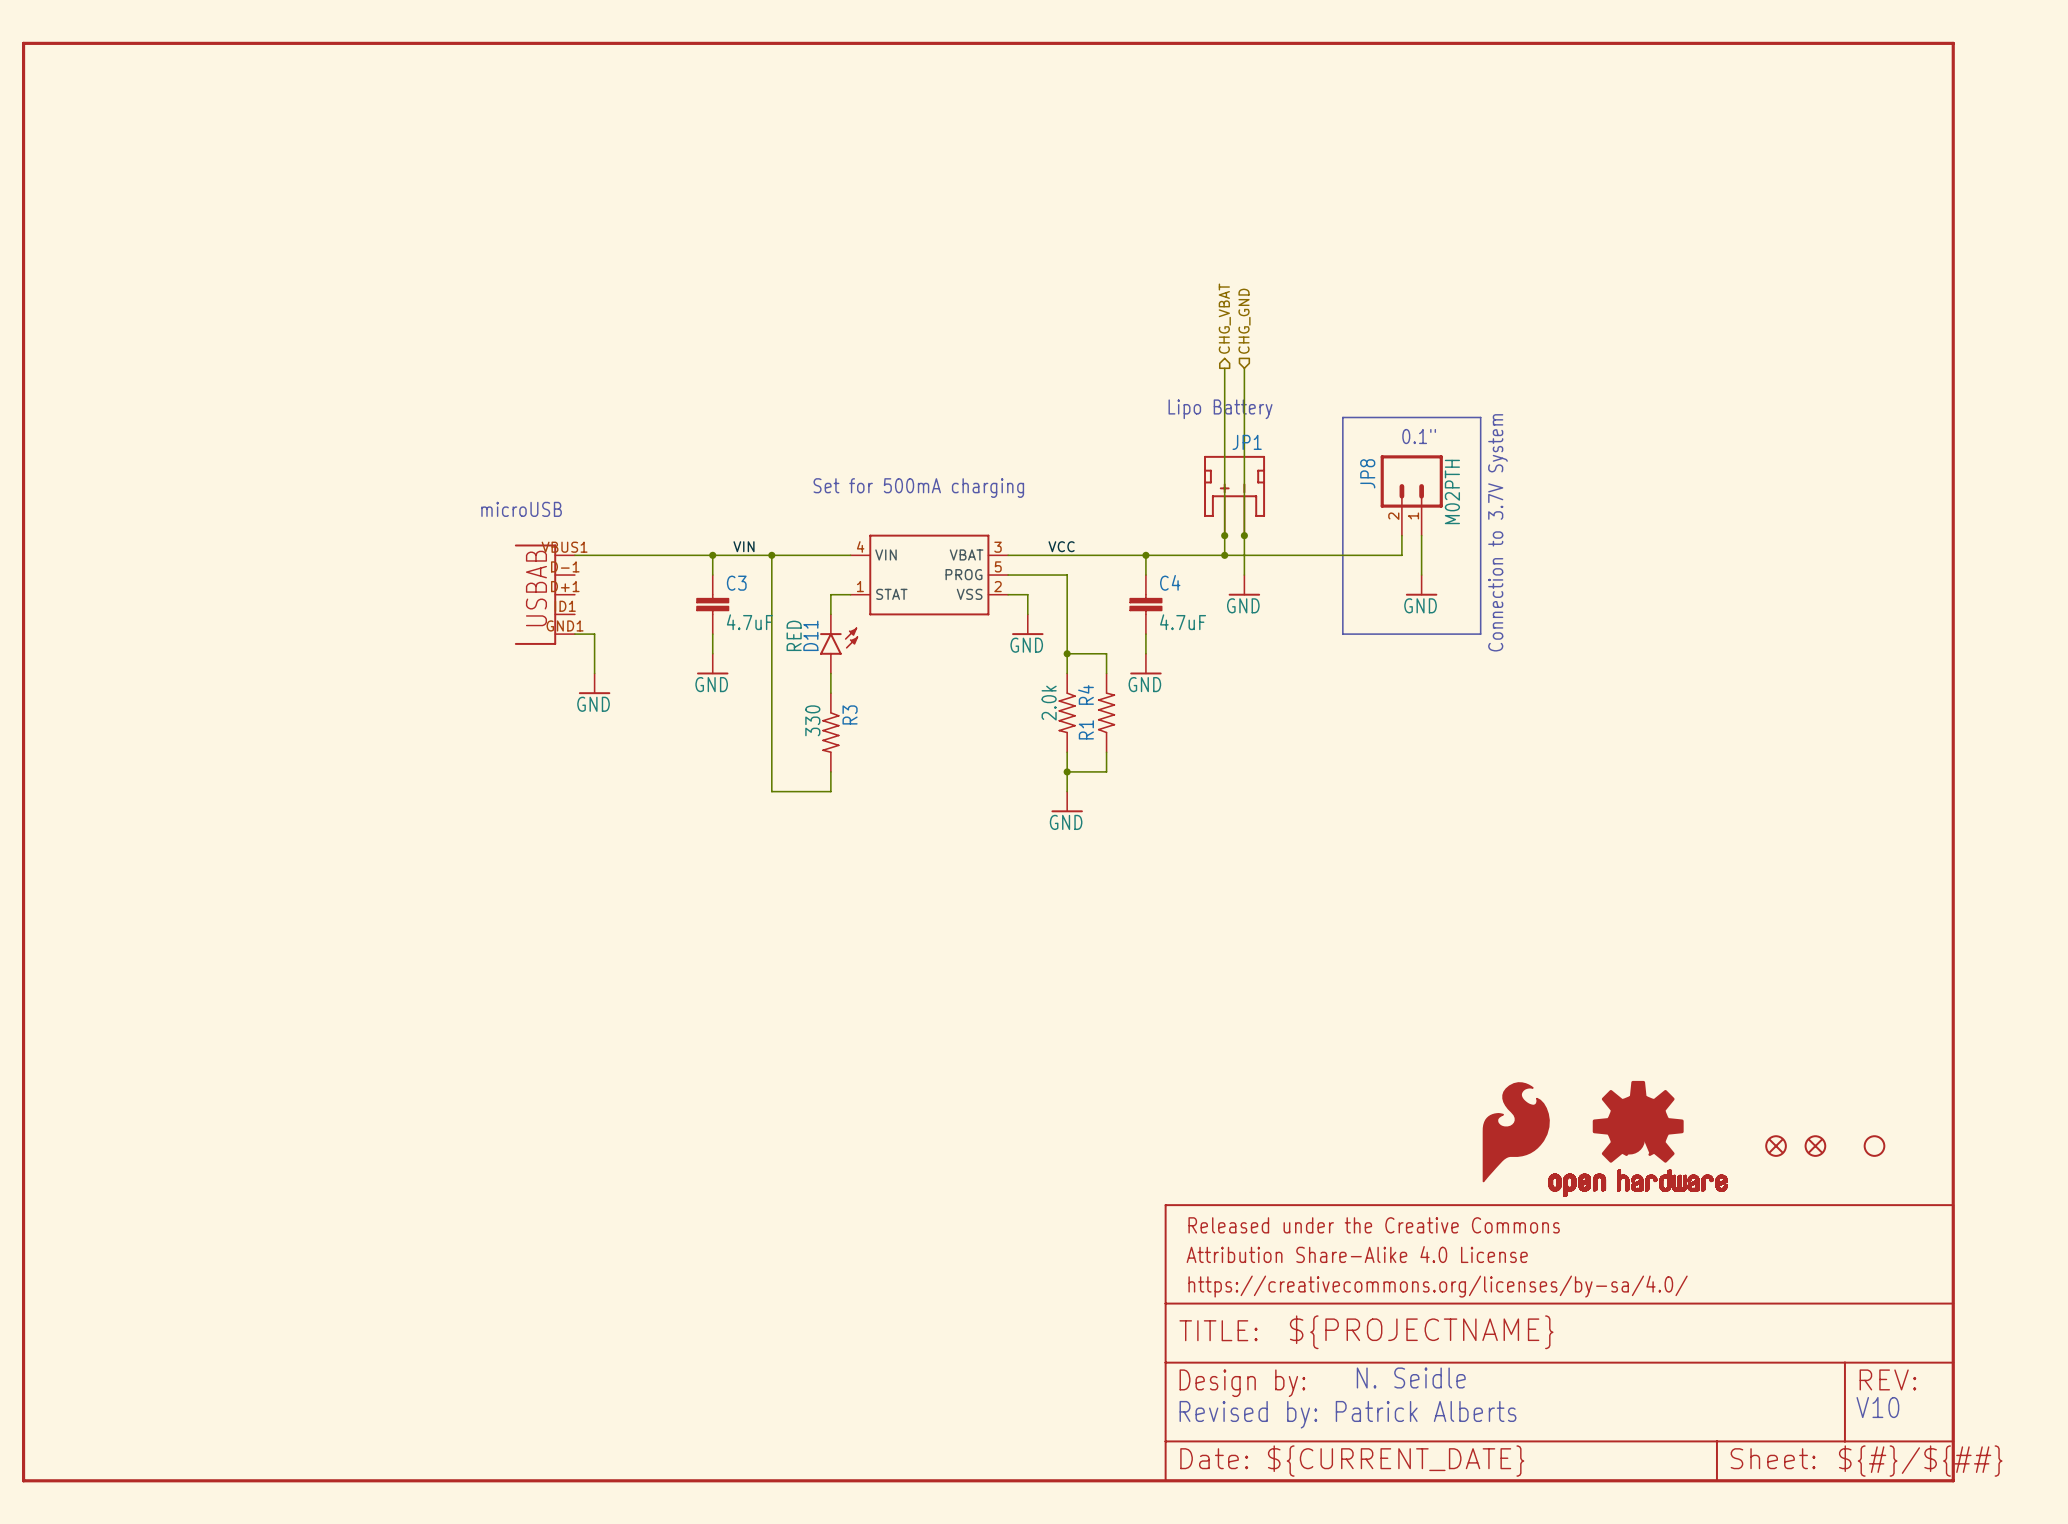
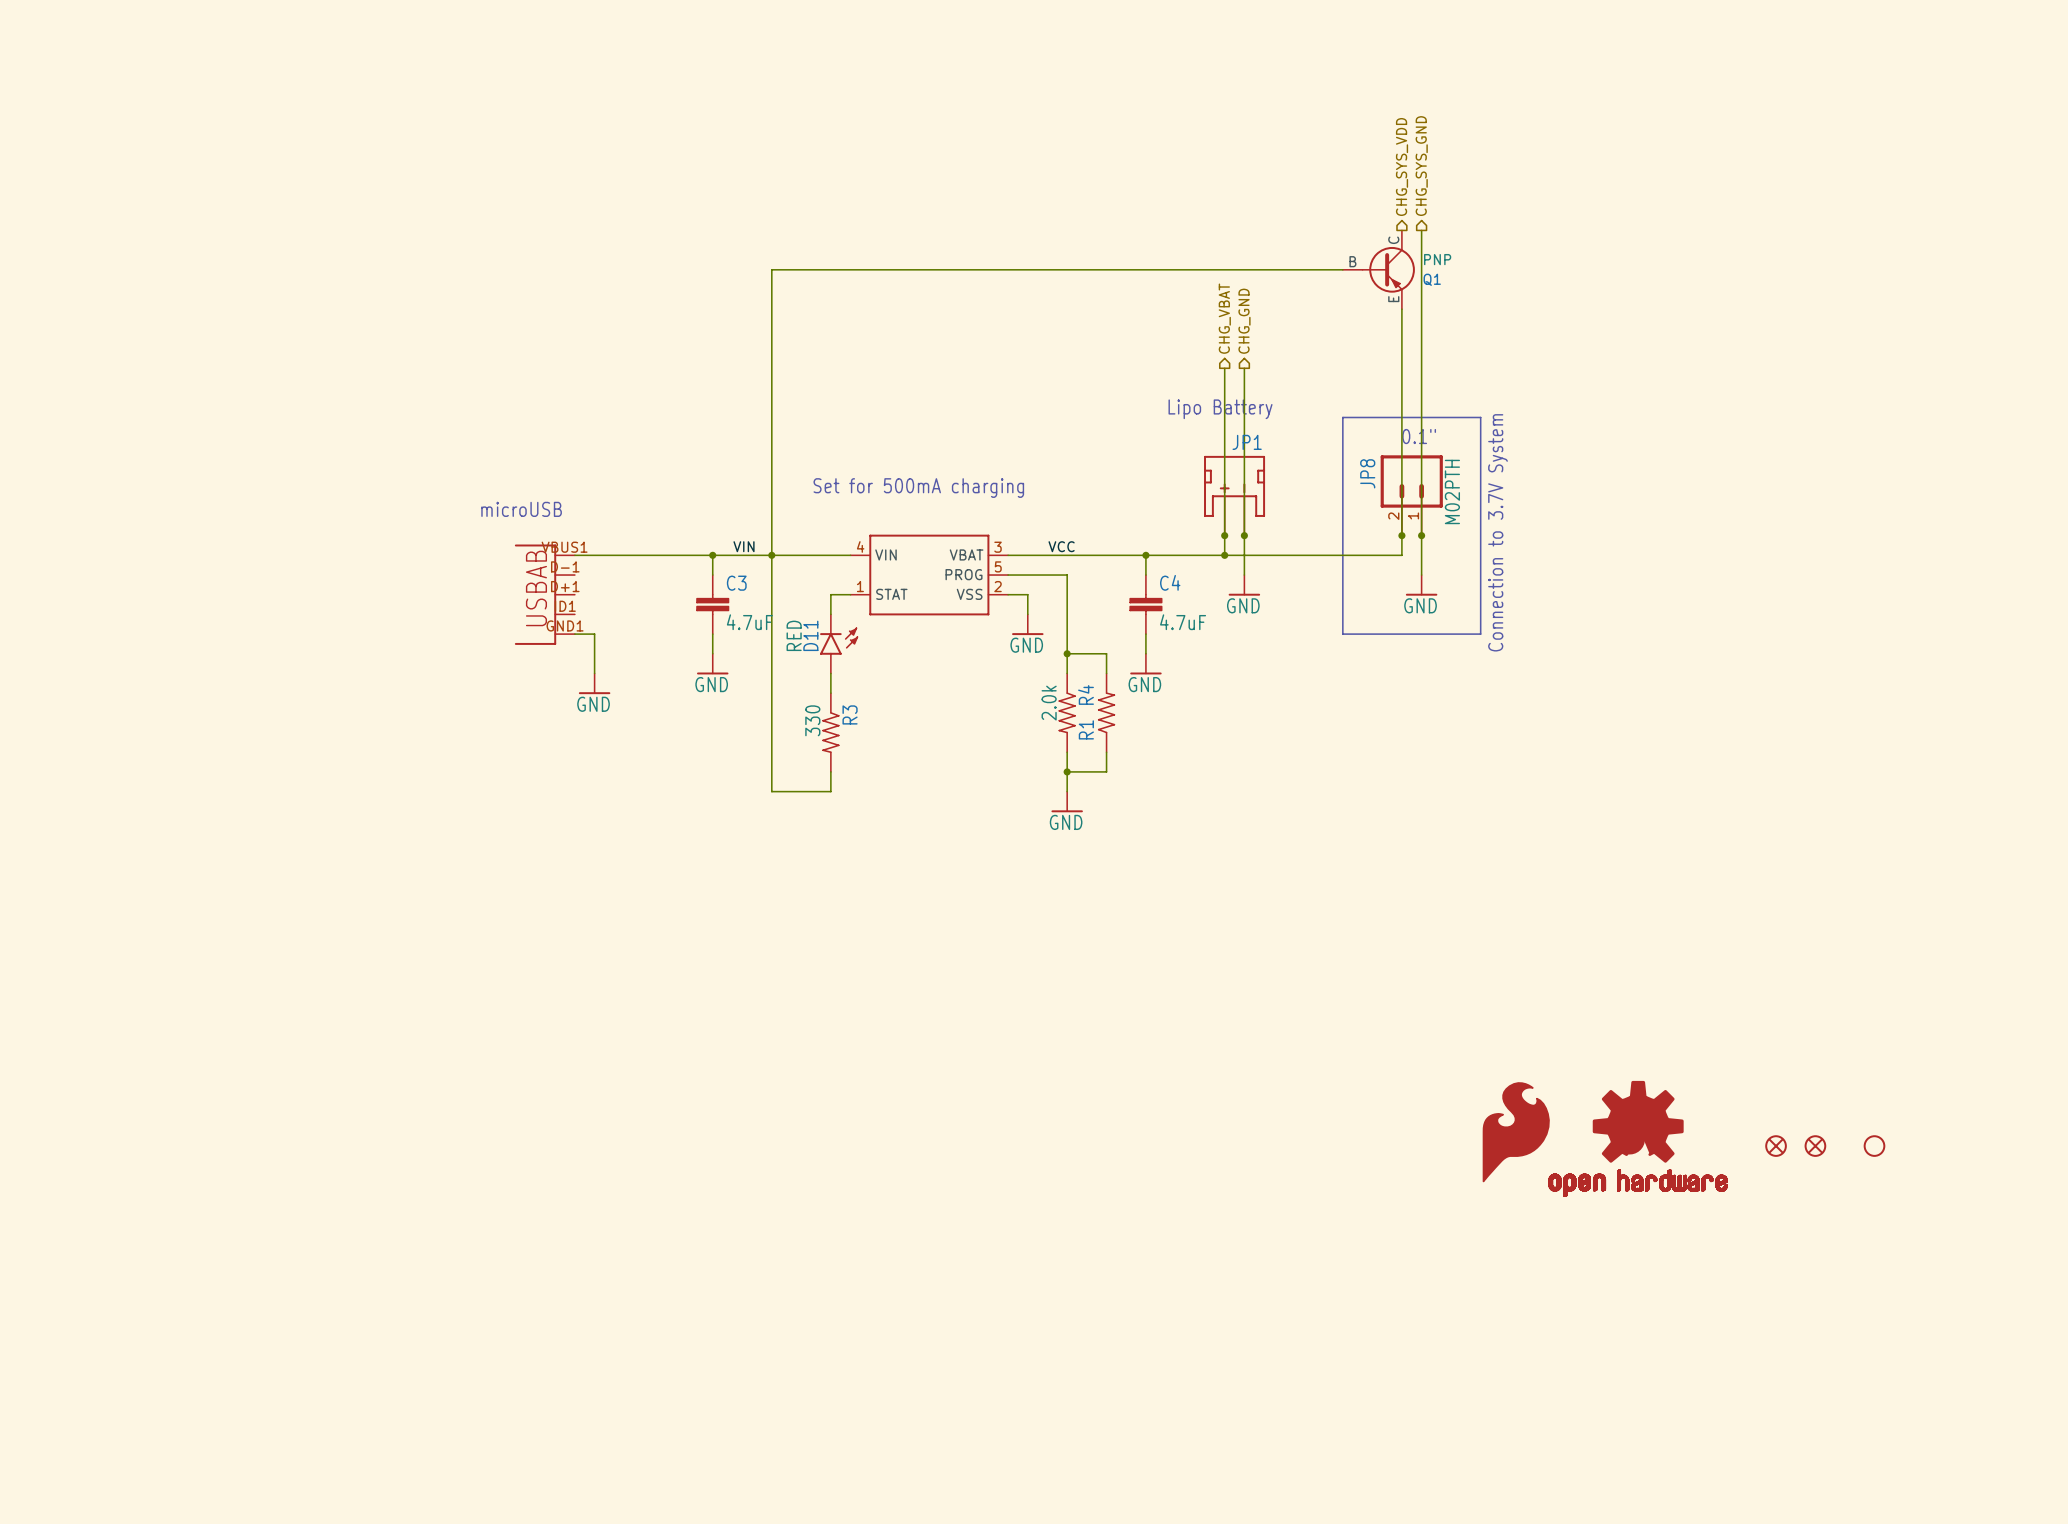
hierarchical label: none -> CHG_SYS_VDD (1402, 166)
hierarchical label: none -> CHG_SYS_GND (1421, 166)
wire: none -> (1421, 230) (1421, 535)
wire: none -> (1342, 269) (771, 269) (771, 555)
Q1: none -> PNP (1378, 269)
wire: none -> (1401, 309) (1401, 535)
hierarchical label shape: input (1244, 321) -> output (1244, 321)
junction: none -> (1401, 535)
junction: none -> (1421, 535)
part: (988, 762) -> none
part: (1559, 1342) -> none
text: N. Seidle (1411, 1377) -> none
text: V10 (1877, 1407) -> none
text: Revised by: Patrick Alberts (1348, 1414) -> none

